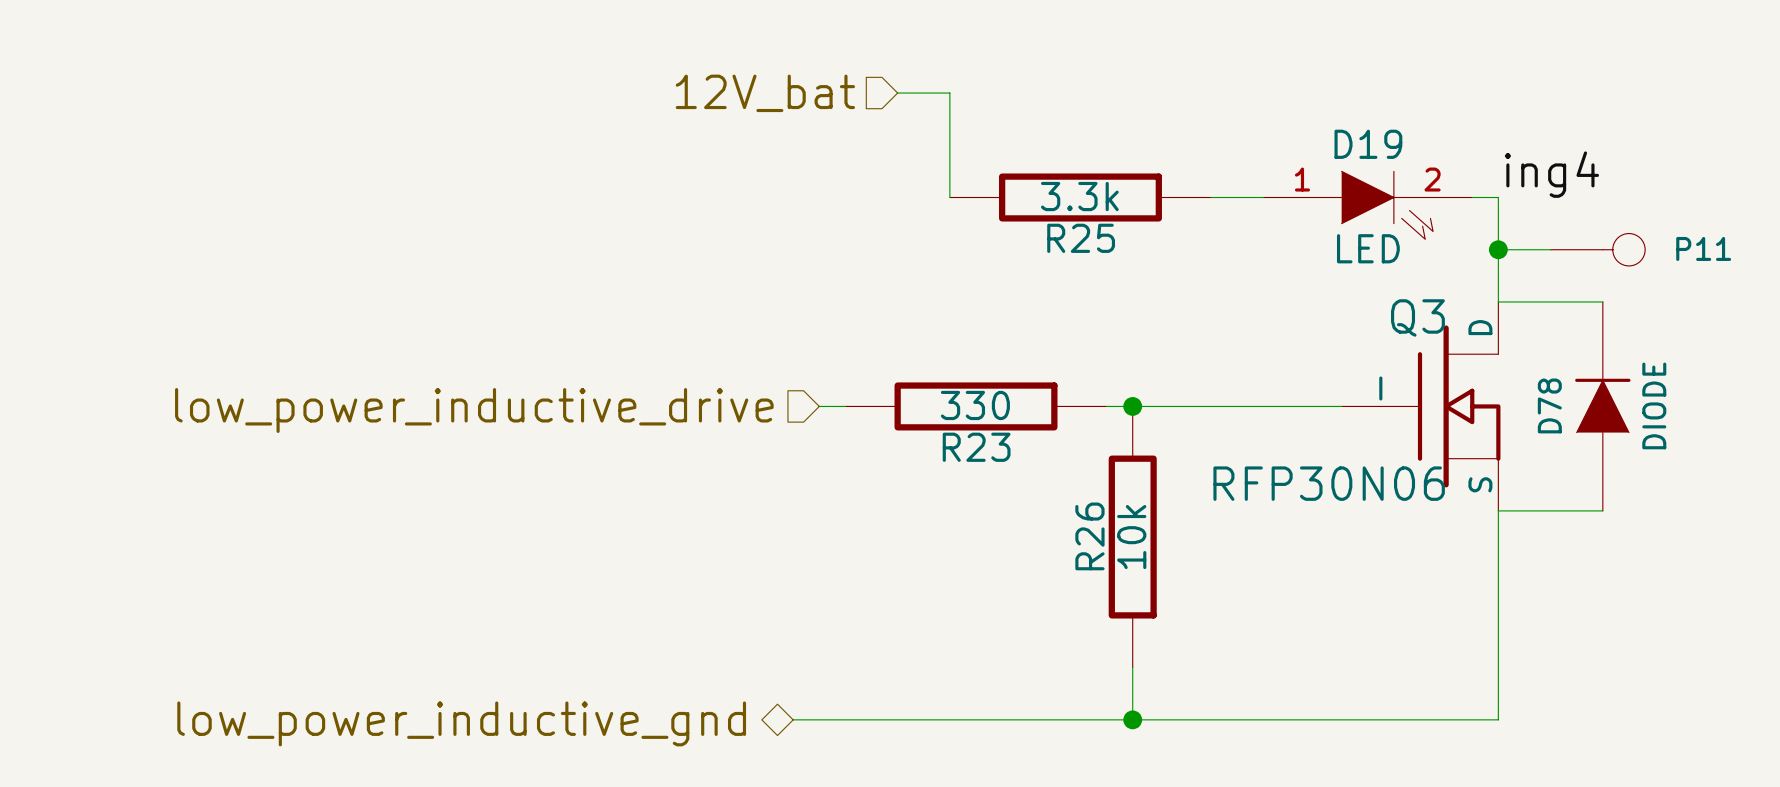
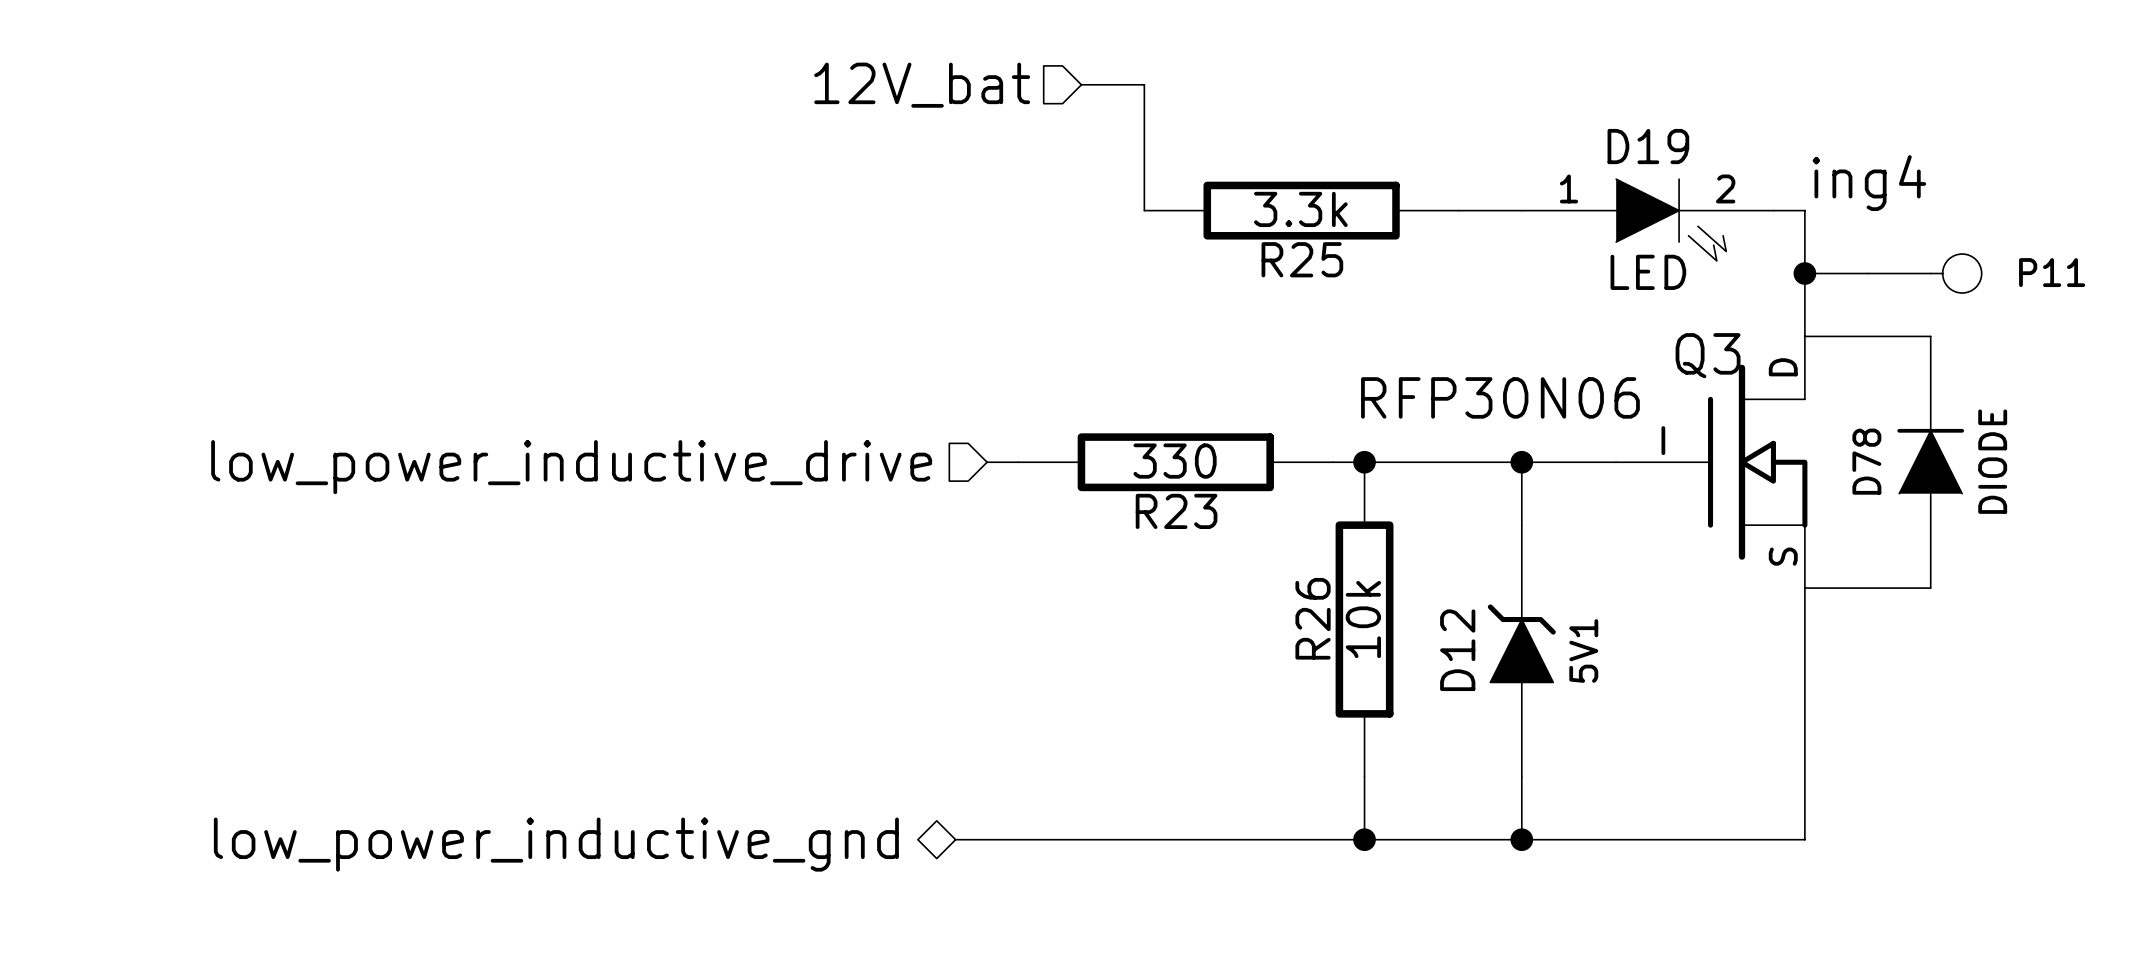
wire: none -> (1521, 462) (1521, 525)
junction: none -> (1521, 462)
Q3 value position: RFP30N06 (1329, 483) -> RFP30N06 (1500, 397)
D12: none -> 5V1 (1521, 650)
wire: none -> (1521, 776) (1521, 839)
junction: none -> (1521, 839)

